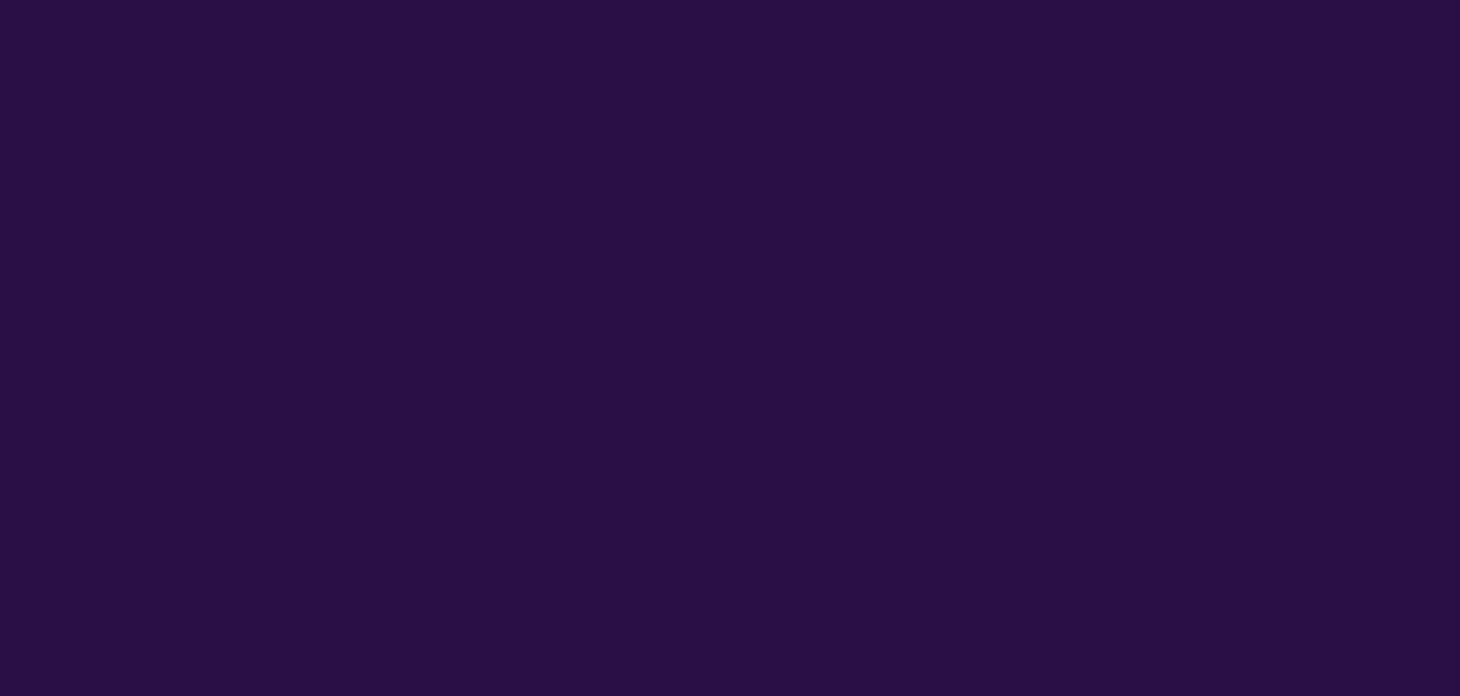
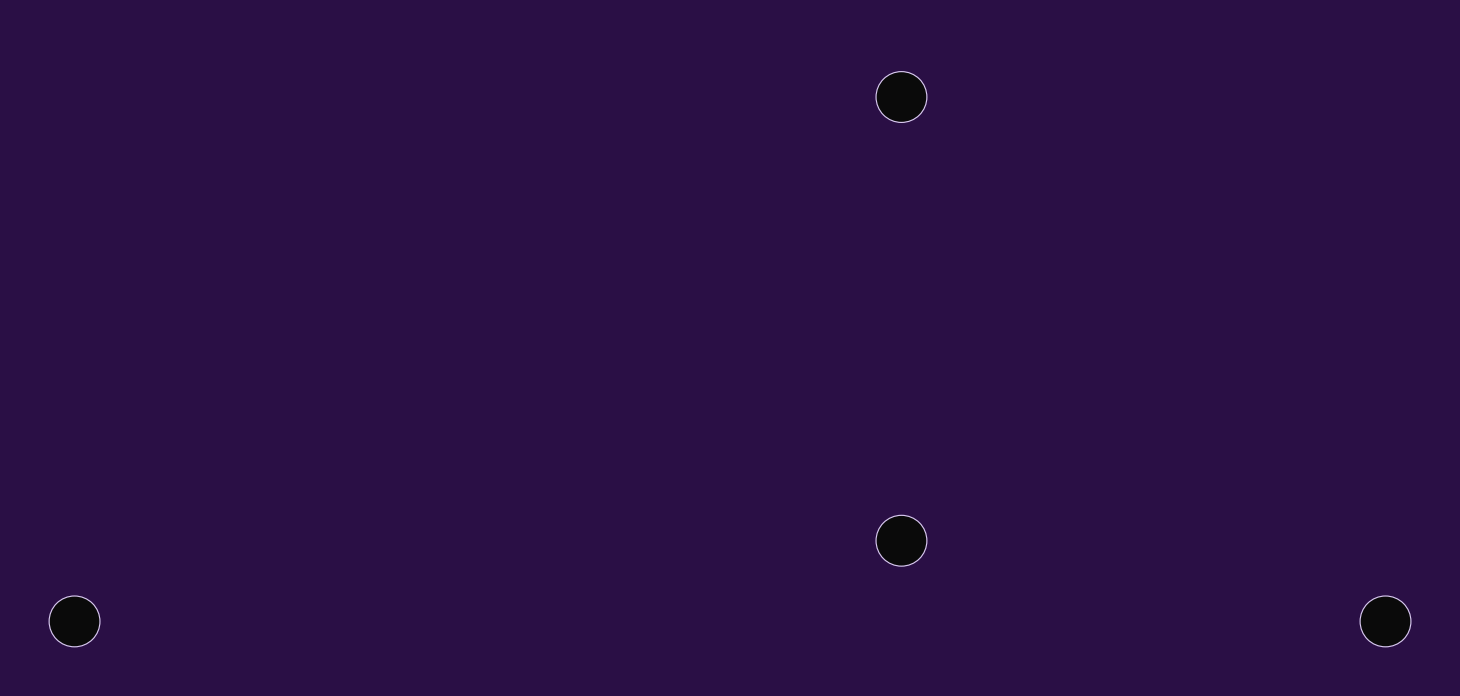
hole: none -> (901, 97)
hole: none -> (901, 540)
hole: none -> (74, 621)
hole: none -> (1385, 621)

